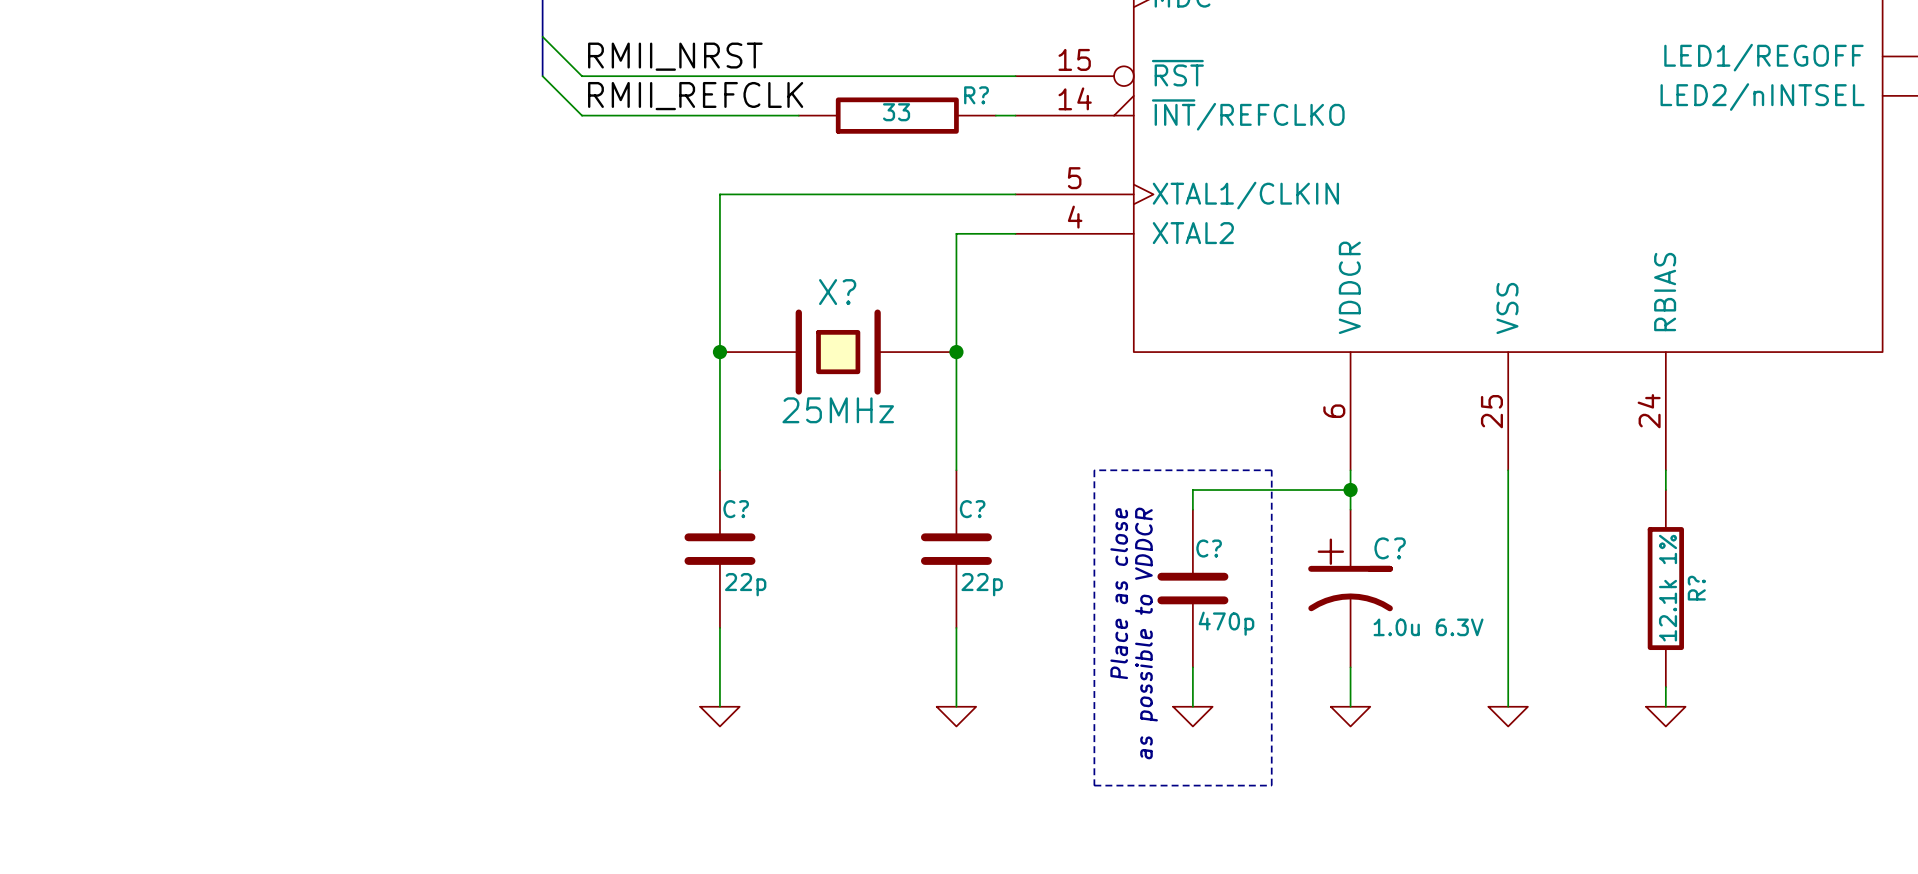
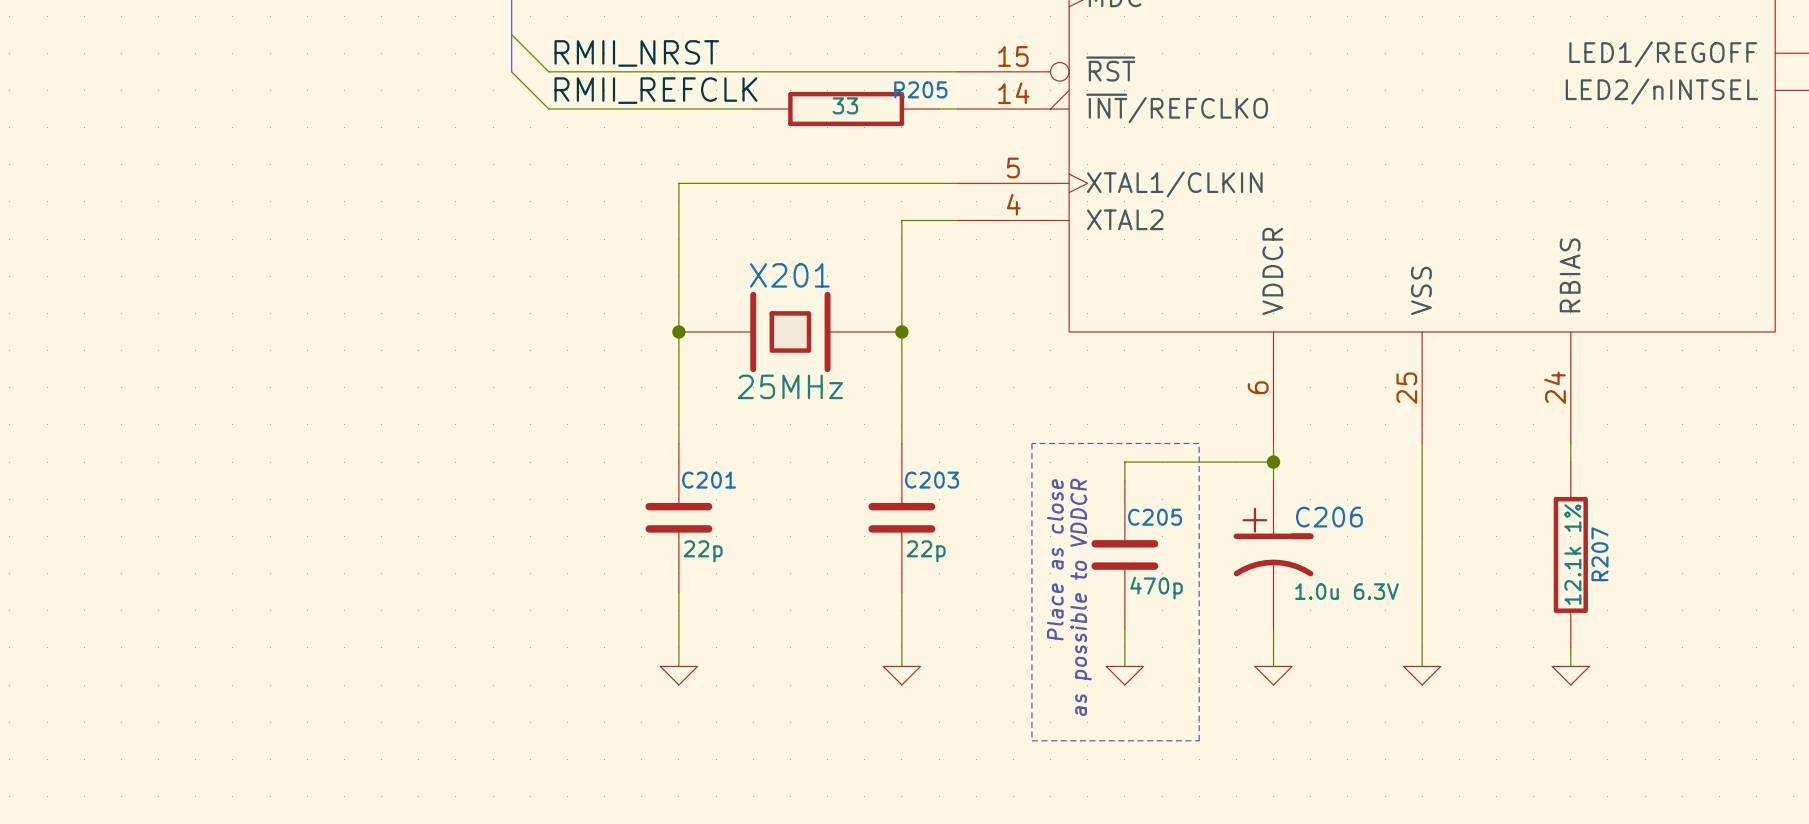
R? name: R? (976, 95) -> R205 (920, 89)
X? name: X? (837, 292) -> X201 (789, 275)
C? name: C? (736, 509) -> C201 (709, 480)
C? name: C? (972, 509) -> C203 (932, 480)
C? name: C? (1209, 548) -> C205 (1154, 517)
C? name: C? (1390, 548) -> C206 (1329, 517)
R? name: R? (1696, 588) -> R207 (1599, 554)

